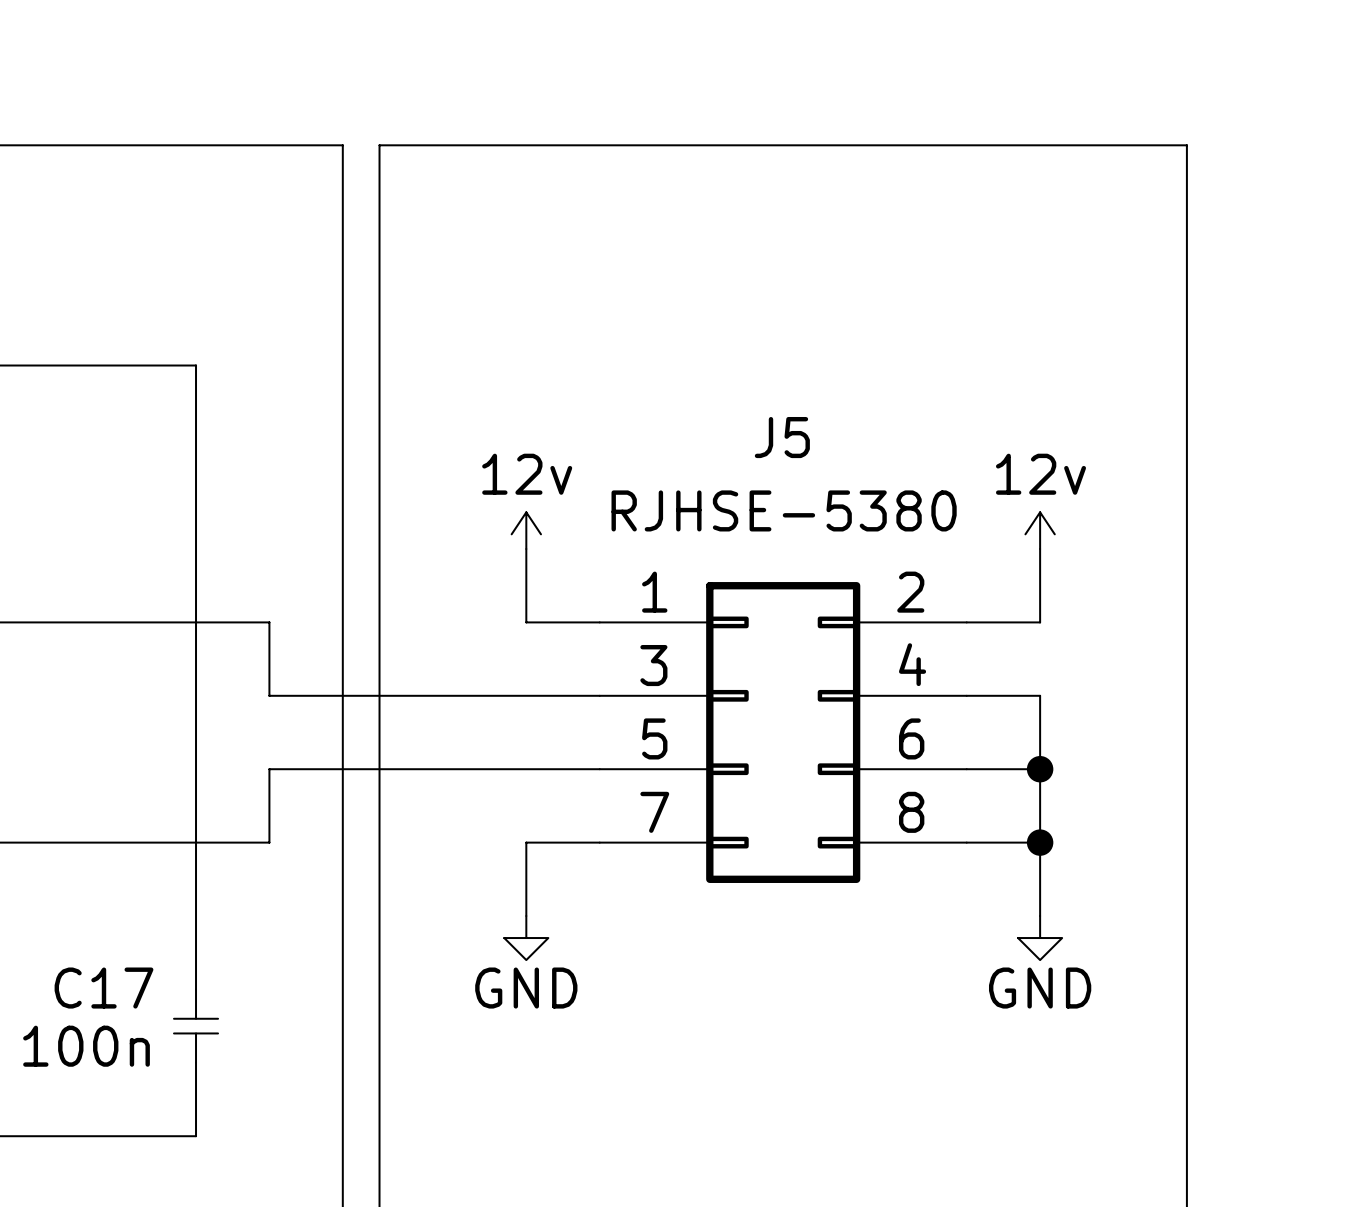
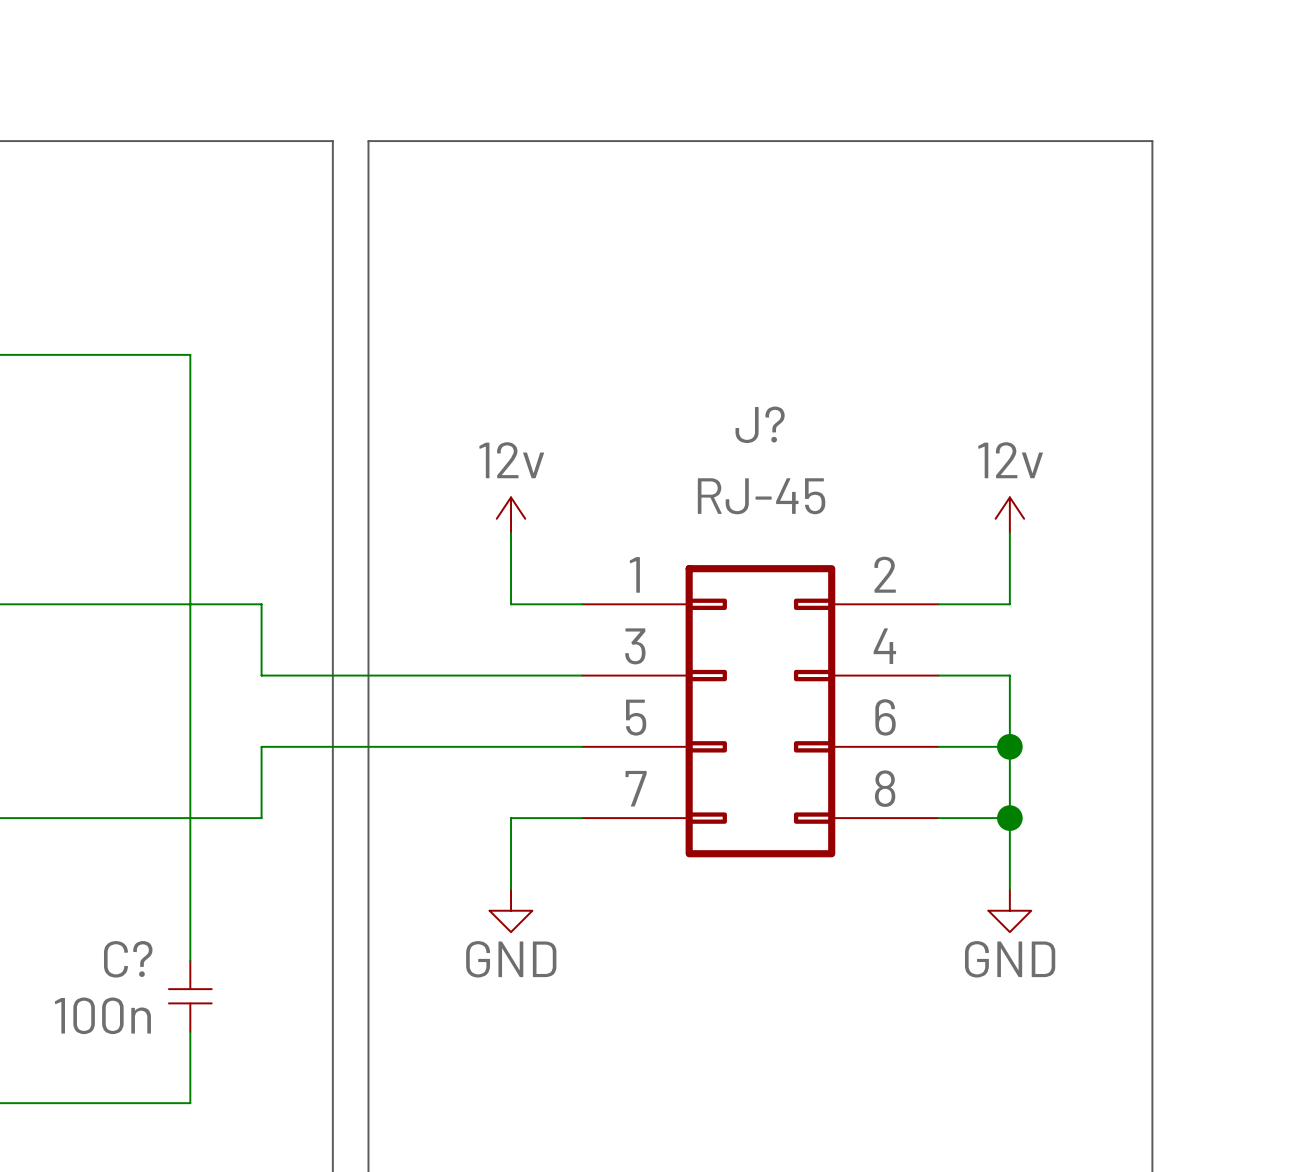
J5 name: J5 (782, 437) -> J? (760, 424)
J5 value: RJHSE-5380 (784, 510) -> RJ-45 (761, 496)
C17 name: C17 (103, 988) -> C? (128, 959)

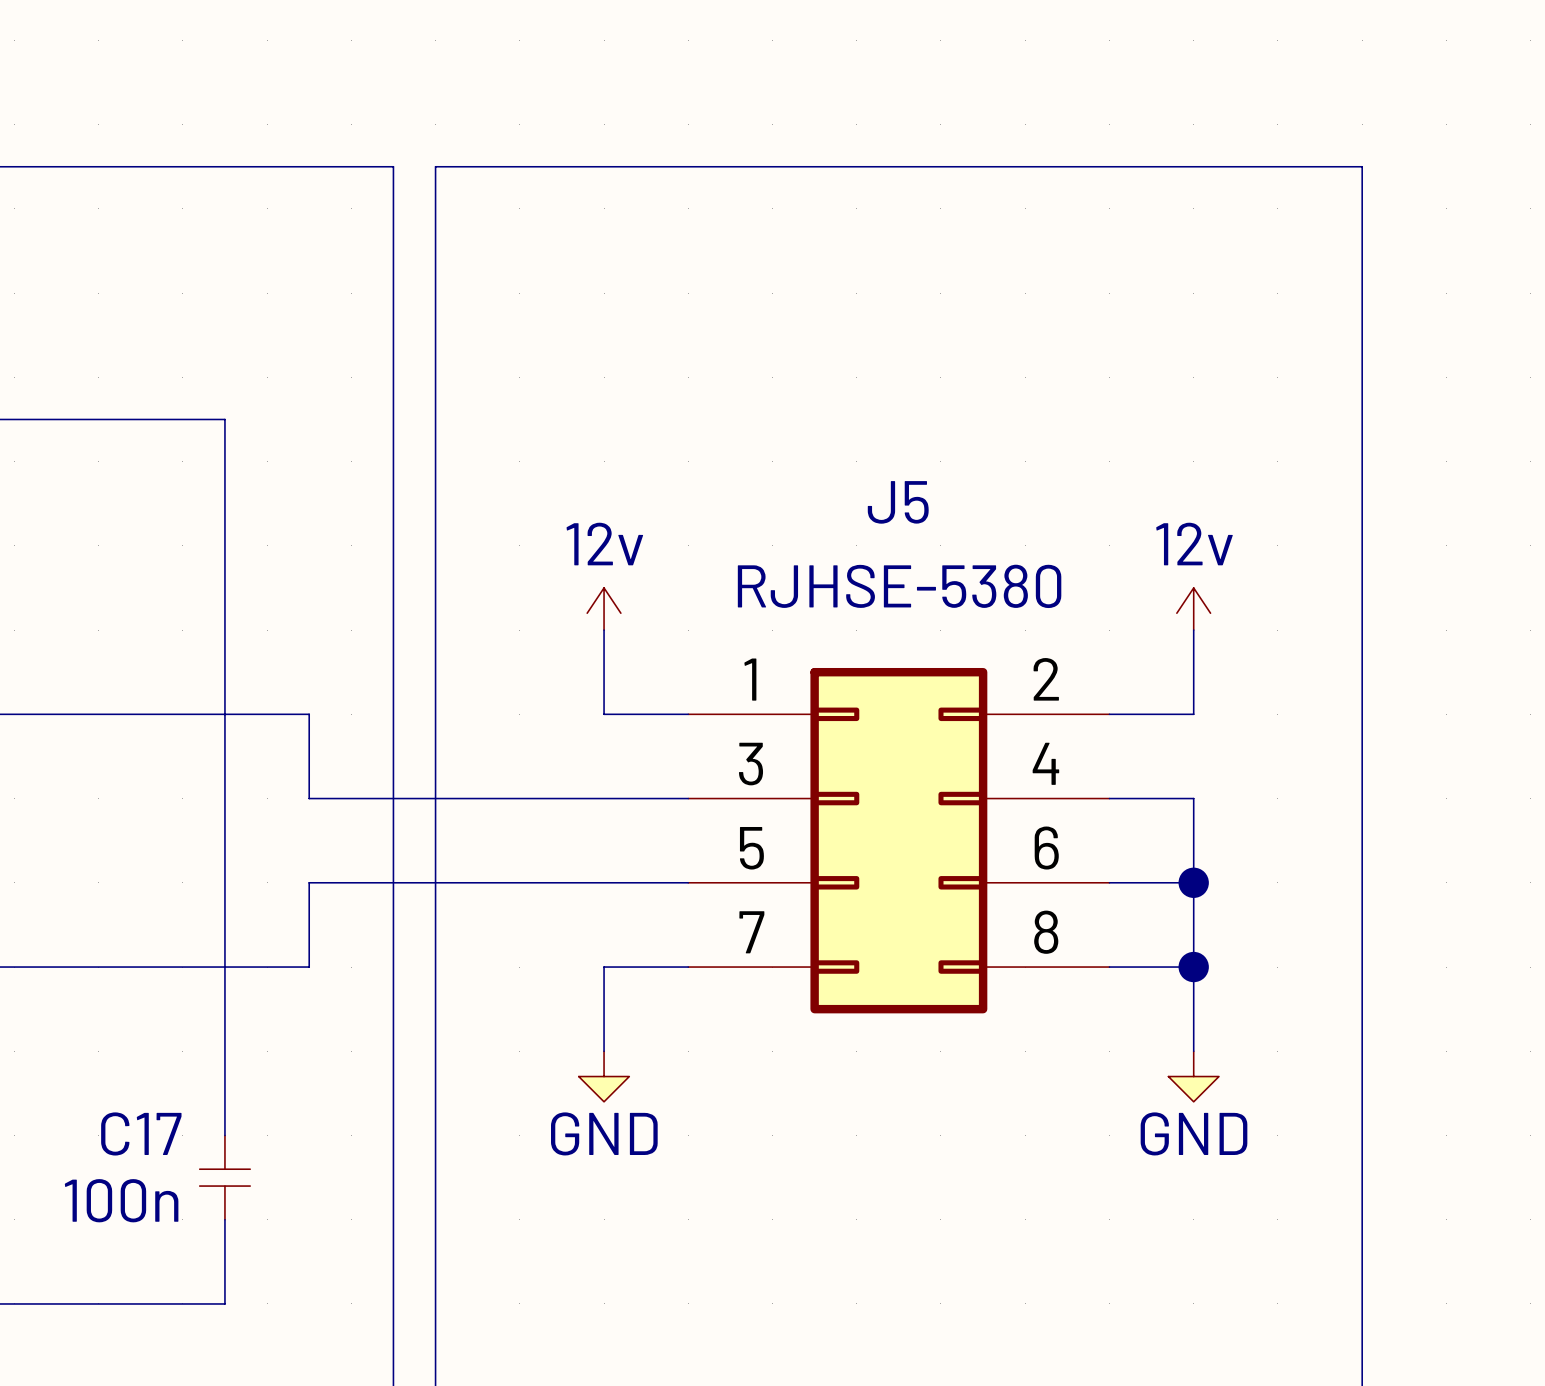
J? name: J? (760, 424) -> J5 (898, 502)
J? value: RJ-45 (761, 496) -> RJHSE-5380 (899, 586)
C? name: C? (128, 959) -> C17 (141, 1133)

